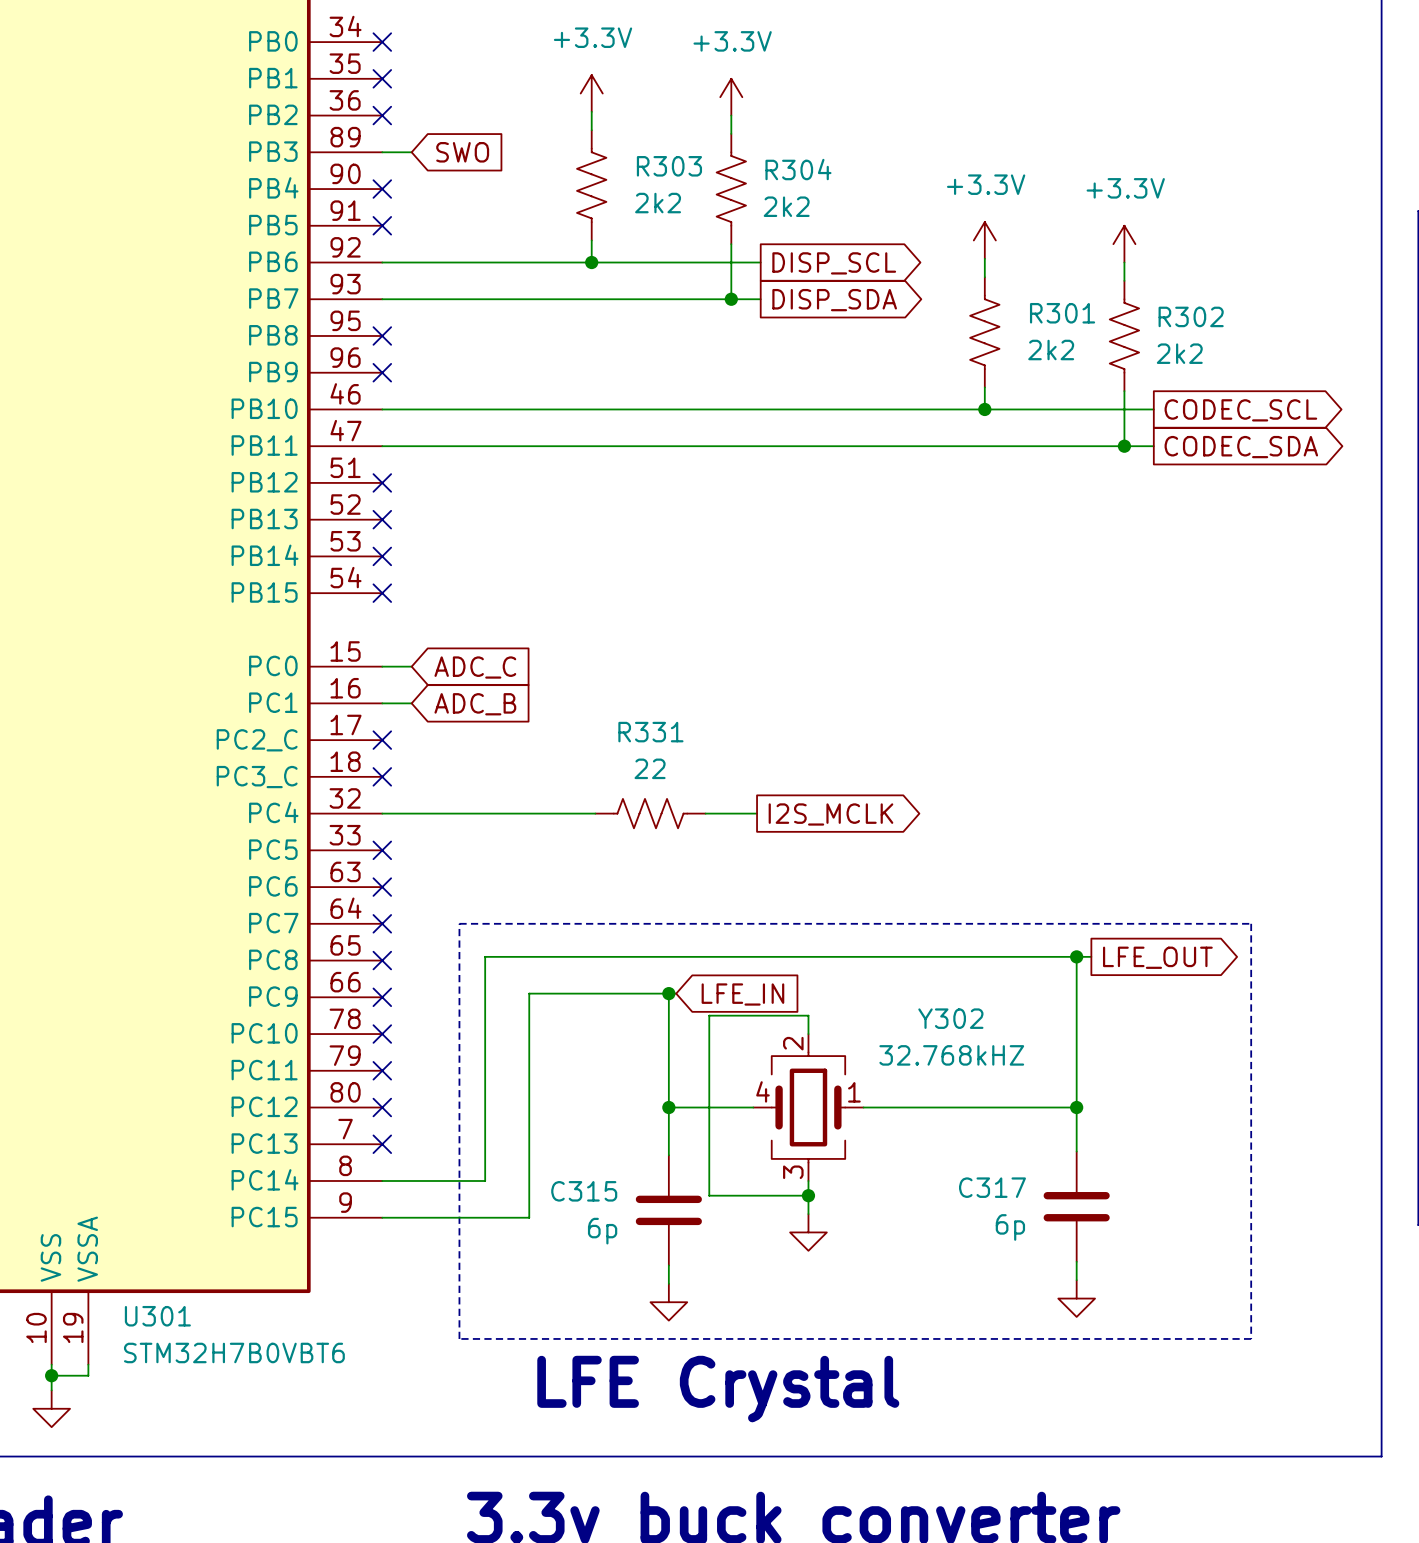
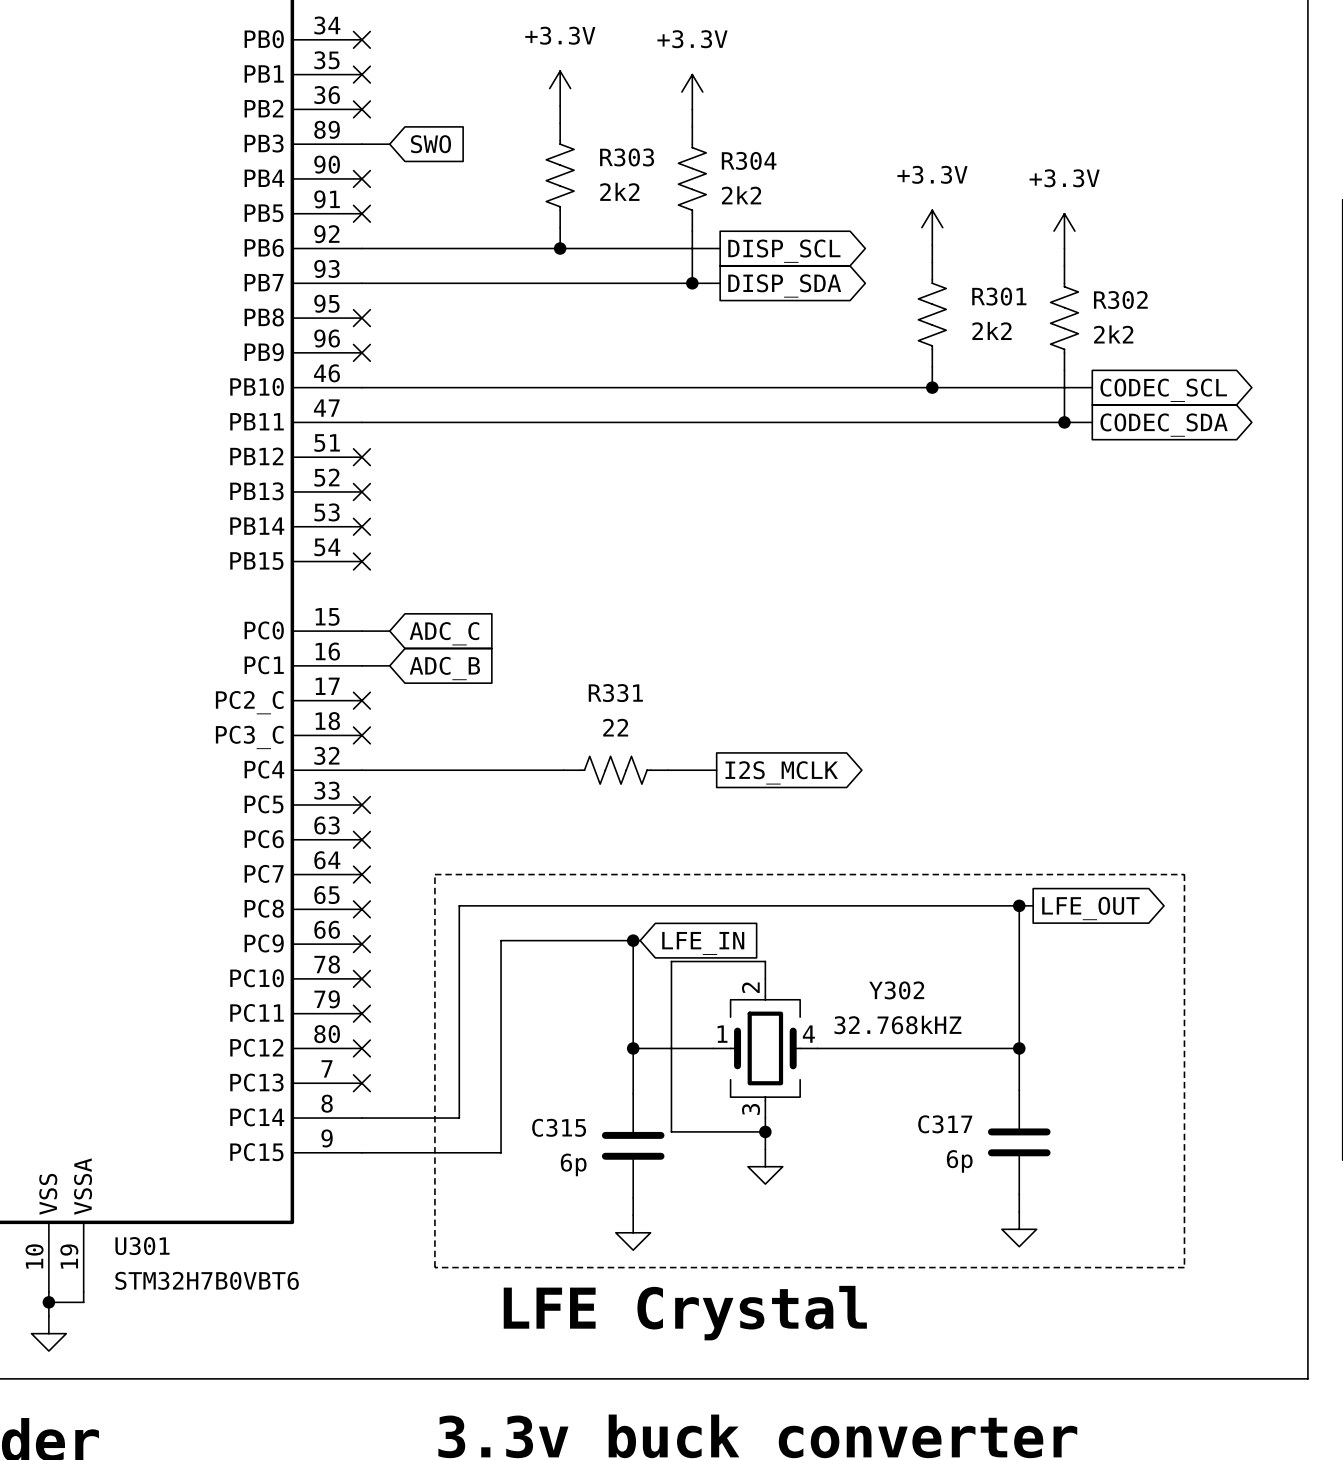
Y302 flip: as is (808, 1107) -> left-right (765, 1048)

